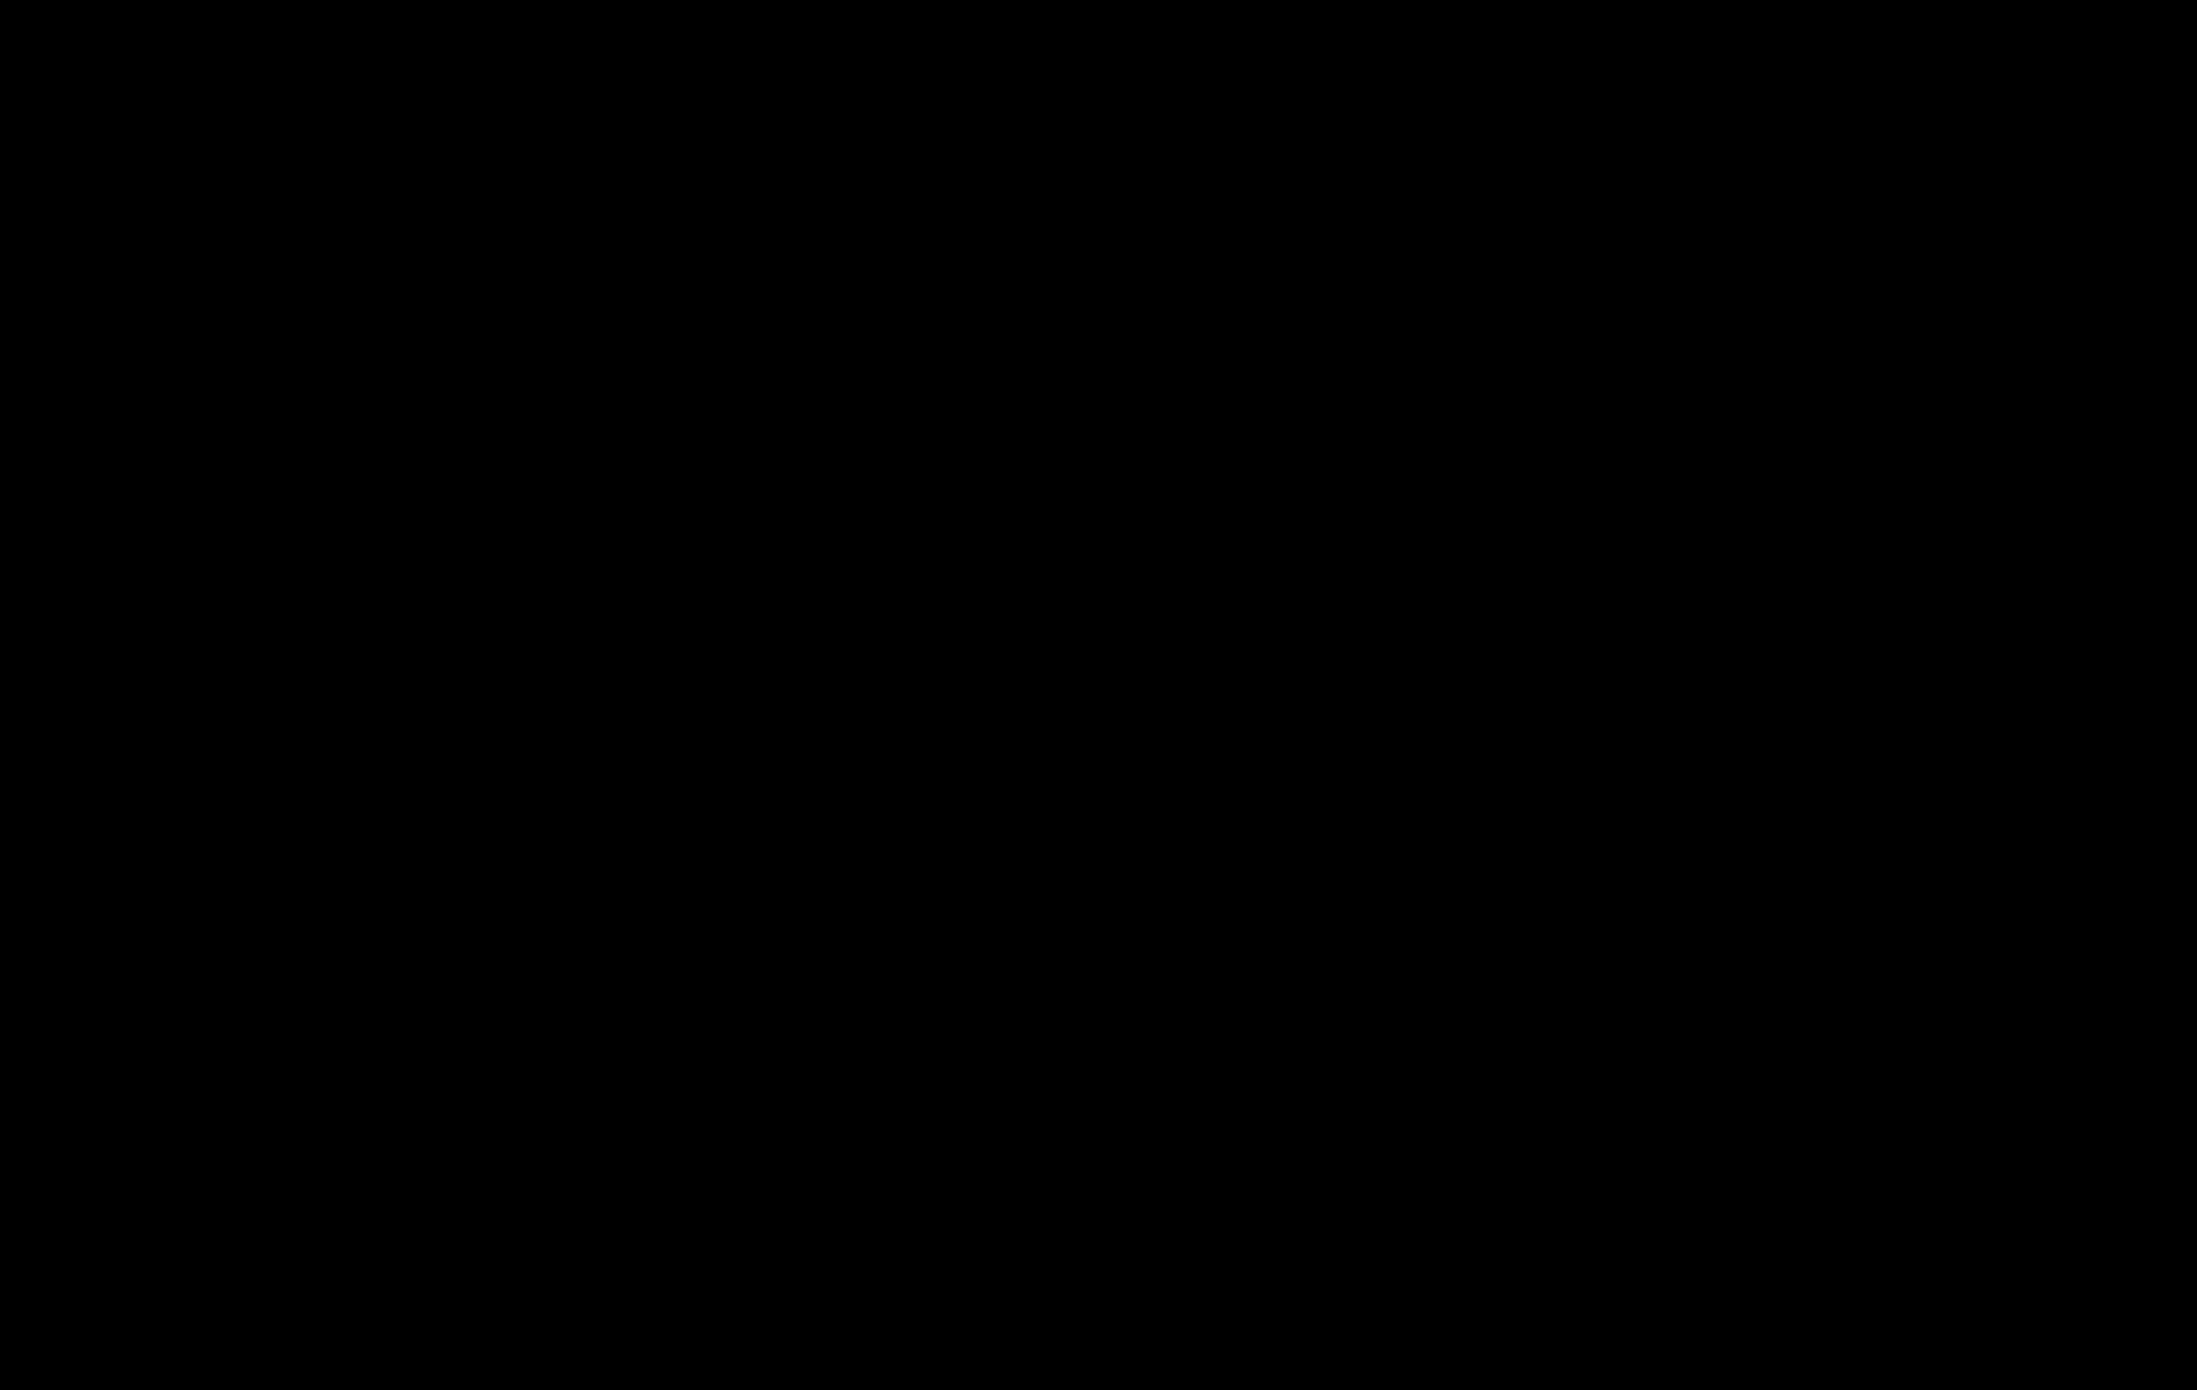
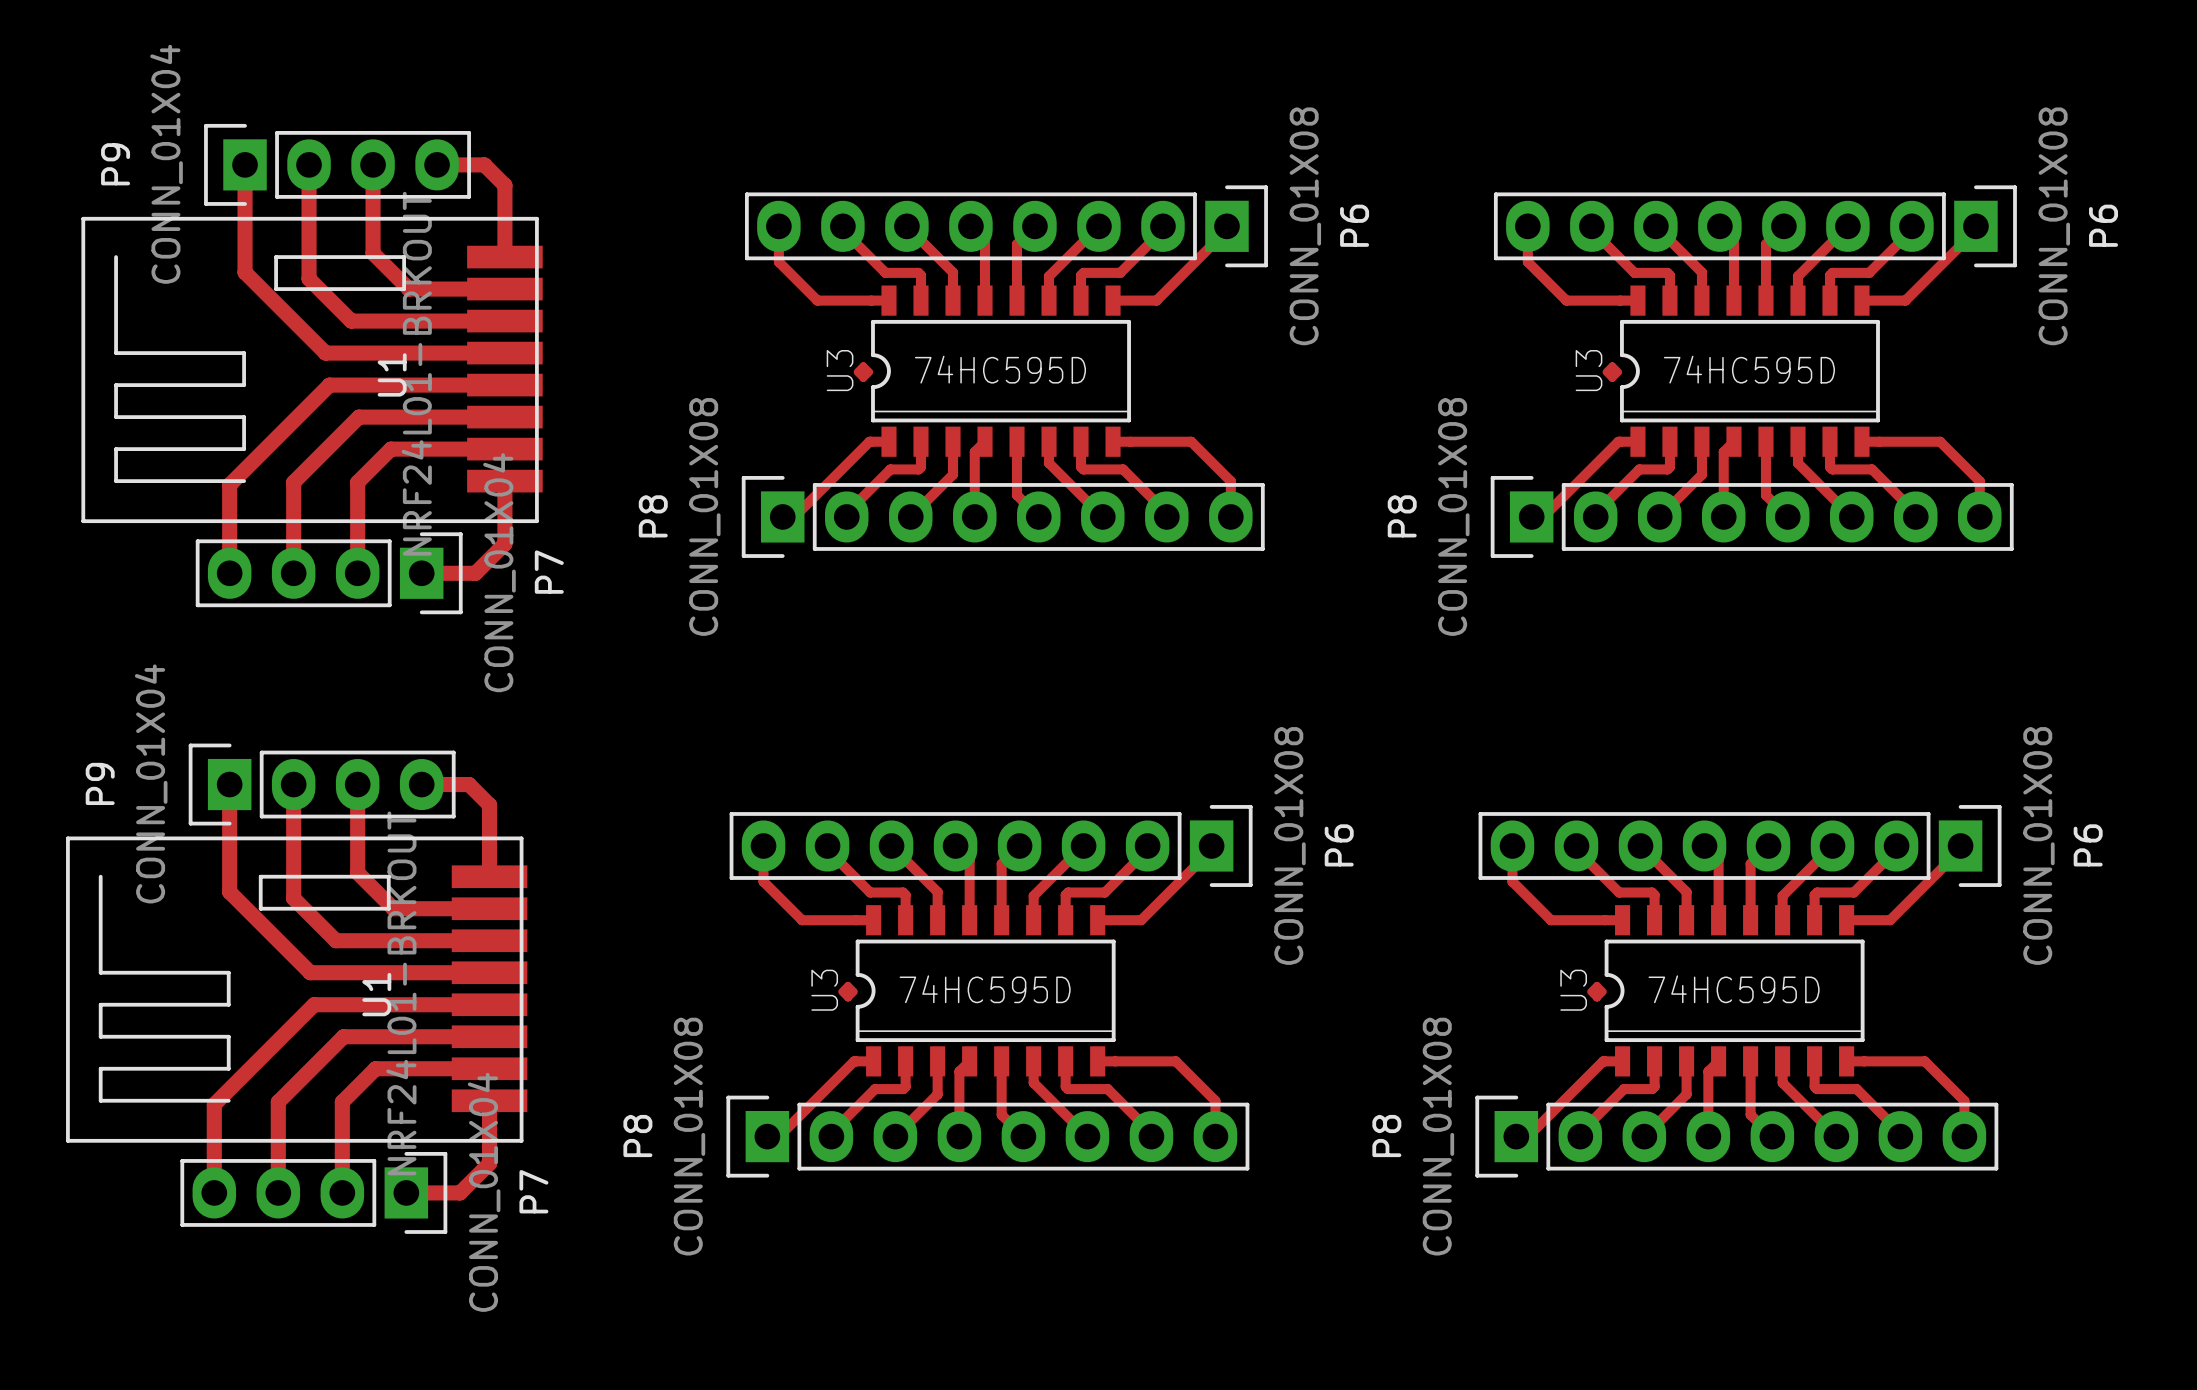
top track: none -> (245, 164) (245, 272) (325, 353) (504, 353)
top track: none -> (309, 164) (309, 278) (351, 321) (504, 321)
P9: none -> CONN_01X04 (337, 164)
top track: none -> (373, 164) (373, 253) (408, 289) (504, 289)
top track: none -> (437, 164) (484, 164) (504, 185) (504, 257)
top track: none -> (778, 226) (778, 262) (817, 300) (888, 300)
top track: none -> (842, 226) (842, 230) (885, 272) (918, 272) (921, 275) (921, 300)
top track: none -> (906, 226) (953, 272) (953, 300)
top track: none -> (970, 226) (985, 240) (985, 300)
P6: none -> CONN_01X08 (1006, 226)
top track: none -> (1034, 226) (1017, 244) (1017, 300)
top track: none -> (1098, 226) (1049, 276) (1049, 300)
top track: none -> (1162, 226) (1162, 230) (1120, 272) (1083, 272) (1081, 275) (1081, 300)
top track: none -> (1226, 226) (1226, 230) (1156, 300) (1113, 300)
top track: none -> (1527, 226) (1527, 262) (1566, 300) (1637, 300)
top track: none -> (1591, 226) (1591, 230) (1634, 272) (1667, 272) (1669, 275) (1669, 300)
top track: none -> (1655, 226) (1701, 272) (1701, 300)
top track: none -> (1719, 226) (1733, 240) (1733, 300)
P6: none -> CONN_01X08 (1755, 226)
top track: none -> (1783, 226) (1765, 244) (1765, 300)
top track: none -> (1847, 226) (1797, 276) (1797, 300)
top track: none -> (1911, 226) (1911, 230) (1869, 272) (1832, 272) (1829, 275) (1829, 300)
top track: none -> (1975, 226) (1975, 230) (1905, 300) (1861, 300)
U1: none -> NRF24L01-BRKOUT (312, 369)
U3: none -> 74HC595D (1001, 371)
U3: none -> 74HC595D (1749, 371)
text: none -> . (863, 372)
text: none -> . (1612, 372)
top track: none -> (504, 385) (329, 385) (229, 484) (229, 573)
top track: none -> (504, 417) (358, 417) (293, 482) (293, 573)
top track: none -> (888, 441) (869, 441) (794, 516) (782, 516)
top track: none -> (921, 441) (921, 466) (918, 469) (890, 469) (846, 513) (846, 516)
top track: none -> (953, 441) (953, 474) (910, 516)
top track: none -> (985, 441) (974, 451) (974, 516)
top track: none -> (1017, 441) (1017, 495) (1038, 516)
top track: none -> (1049, 441) (1049, 463) (1102, 516)
top track: none -> (1081, 441) (1081, 466) (1083, 469) (1123, 469) (1166, 513) (1166, 516)
top track: none -> (1113, 441) (1191, 441) (1230, 481) (1230, 516)
top track: none -> (1637, 441) (1618, 441) (1543, 516) (1531, 516)
top track: none -> (1669, 441) (1669, 466) (1667, 469) (1639, 469) (1595, 513) (1595, 516)
top track: none -> (1701, 441) (1701, 474) (1659, 516)
top track: none -> (1733, 441) (1723, 451) (1723, 516)
top track: none -> (1765, 441) (1765, 495) (1787, 516)
top track: none -> (1797, 441) (1797, 463) (1851, 516)
top track: none -> (1829, 441) (1829, 466) (1832, 469) (1872, 469) (1915, 513) (1915, 516)
top track: none -> (1861, 441) (1940, 441) (1979, 481) (1979, 516)
top track: none -> (504, 449) (390, 449) (357, 482) (357, 573)
top track: none -> (504, 481) (504, 543) (475, 573) (421, 573)
P8: none -> CONN_01X08 (1003, 516)
P8: none -> CONN_01X08 (1752, 516)
P7: none -> CONN_01X04 (329, 573)
top track: none -> (229, 784) (229, 892) (310, 972) (489, 972)
top track: none -> (293, 784) (293, 898) (335, 940) (489, 940)
P9: none -> CONN_01X04 (322, 784)
top track: none -> (357, 784) (357, 872) (393, 908) (489, 908)
top track: none -> (421, 784) (469, 784) (489, 805) (489, 876)
top track: none -> (763, 845) (763, 881) (802, 920) (873, 920)
top track: none -> (827, 845) (827, 849) (870, 892) (903, 892) (905, 895) (905, 920)
top track: none -> (891, 845) (937, 892) (937, 920)
top track: none -> (955, 845) (969, 860) (969, 920)
P6: none -> CONN_01X08 (991, 845)
top track: none -> (1019, 845) (1001, 863) (1001, 920)
top track: none -> (1083, 845) (1033, 895) (1033, 920)
top track: none -> (1147, 845) (1147, 849) (1104, 892) (1068, 892) (1065, 895) (1065, 920)
top track: none -> (1211, 845) (1211, 849) (1141, 920) (1097, 920)
top track: none -> (1512, 845) (1512, 881) (1551, 920) (1622, 920)
top track: none -> (1576, 845) (1576, 849) (1619, 892) (1652, 892) (1654, 895) (1654, 920)
top track: none -> (1640, 845) (1686, 892) (1686, 920)
top track: none -> (1704, 845) (1718, 860) (1718, 920)
P6: none -> CONN_01X08 (1740, 845)
top track: none -> (1768, 845) (1750, 863) (1750, 920)
top track: none -> (1832, 845) (1782, 895) (1782, 920)
top track: none -> (1896, 845) (1896, 849) (1853, 892) (1817, 892) (1814, 895) (1814, 920)
top track: none -> (1960, 845) (1960, 849) (1890, 920) (1846, 920)
U1: none -> NRF24L01-BRKOUT (296, 989)
U3: none -> 74HC595D (985, 990)
U3: none -> 74HC595D (1734, 990)
text: none -> . (848, 991)
text: none -> . (1596, 991)
top track: none -> (489, 1004) (314, 1004) (214, 1104) (214, 1192)
top track: none -> (489, 1036) (343, 1036) (278, 1102) (278, 1192)
top track: none -> (873, 1061) (854, 1061) (778, 1136) (767, 1136)
top track: none -> (905, 1061) (905, 1086) (903, 1089) (875, 1089) (831, 1132) (831, 1136)
top track: none -> (937, 1061) (937, 1094) (895, 1136)
top track: none -> (969, 1061) (959, 1071) (959, 1136)
top track: none -> (1001, 1061) (1001, 1114) (1023, 1136)
top track: none -> (1033, 1061) (1033, 1082) (1087, 1136)
top track: none -> (1065, 1061) (1065, 1086) (1068, 1089) (1107, 1089) (1151, 1132) (1151, 1136)
top track: none -> (1097, 1061) (1175, 1061) (1215, 1100) (1215, 1136)
top track: none -> (1622, 1061) (1603, 1061) (1527, 1136) (1516, 1136)
top track: none -> (1654, 1061) (1654, 1086) (1652, 1089) (1624, 1089) (1580, 1132) (1580, 1136)
top track: none -> (1686, 1061) (1686, 1094) (1644, 1136)
top track: none -> (1718, 1061) (1708, 1071) (1708, 1136)
top track: none -> (1750, 1061) (1750, 1114) (1772, 1136)
top track: none -> (1782, 1061) (1782, 1082) (1836, 1136)
top track: none -> (1814, 1061) (1814, 1086) (1817, 1089) (1856, 1089) (1900, 1132) (1900, 1136)
top track: none -> (1846, 1061) (1924, 1061) (1964, 1100) (1964, 1136)
top track: none -> (489, 1068) (375, 1068) (342, 1102) (342, 1192)
top track: none -> (489, 1100) (489, 1163) (460, 1192) (406, 1192)
P8: none -> CONN_01X08 (987, 1136)
P8: none -> CONN_01X08 (1736, 1136)
P7: none -> CONN_01X04 (313, 1192)

